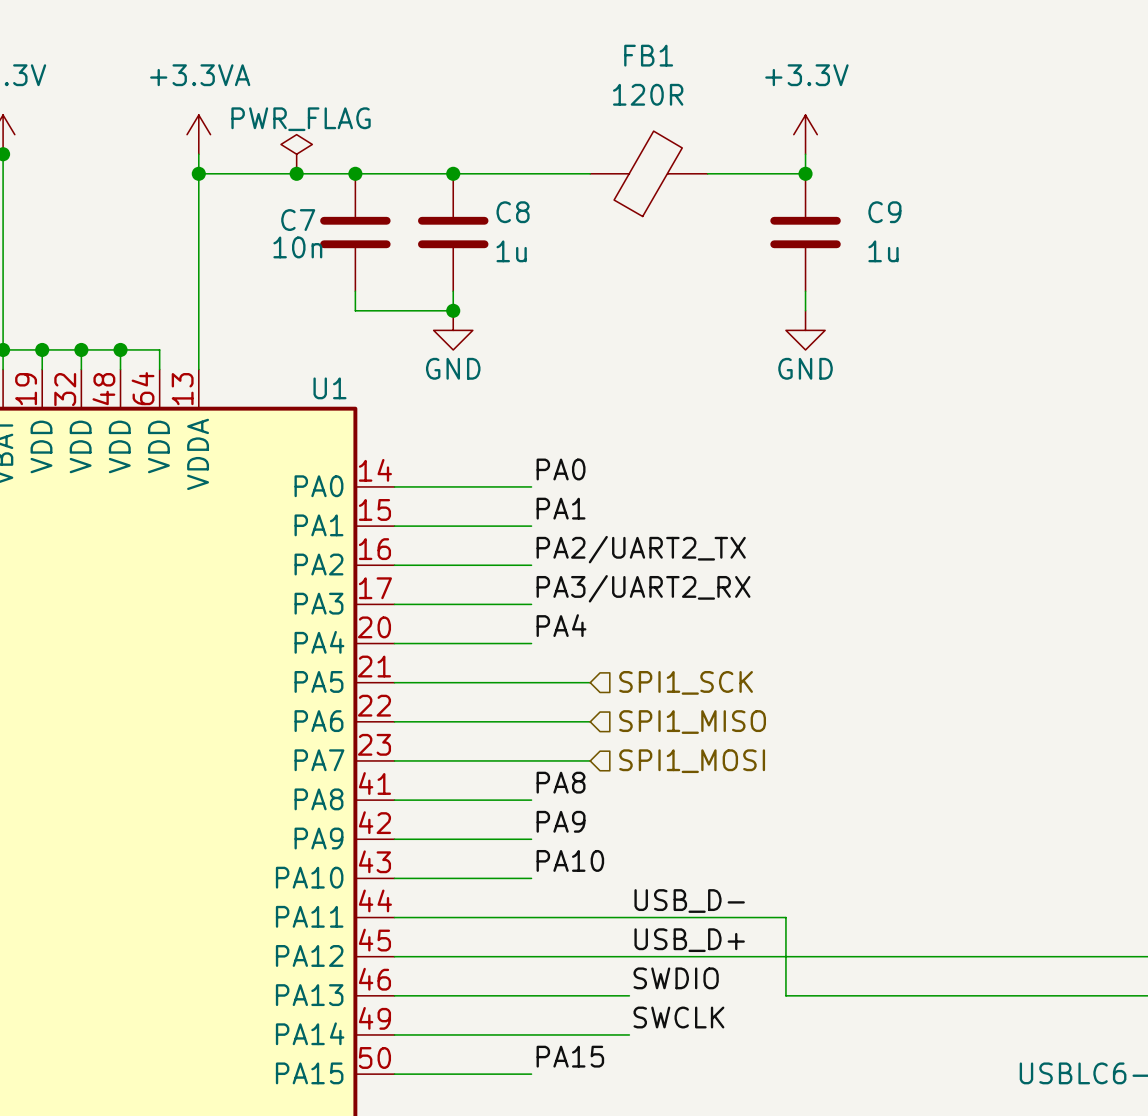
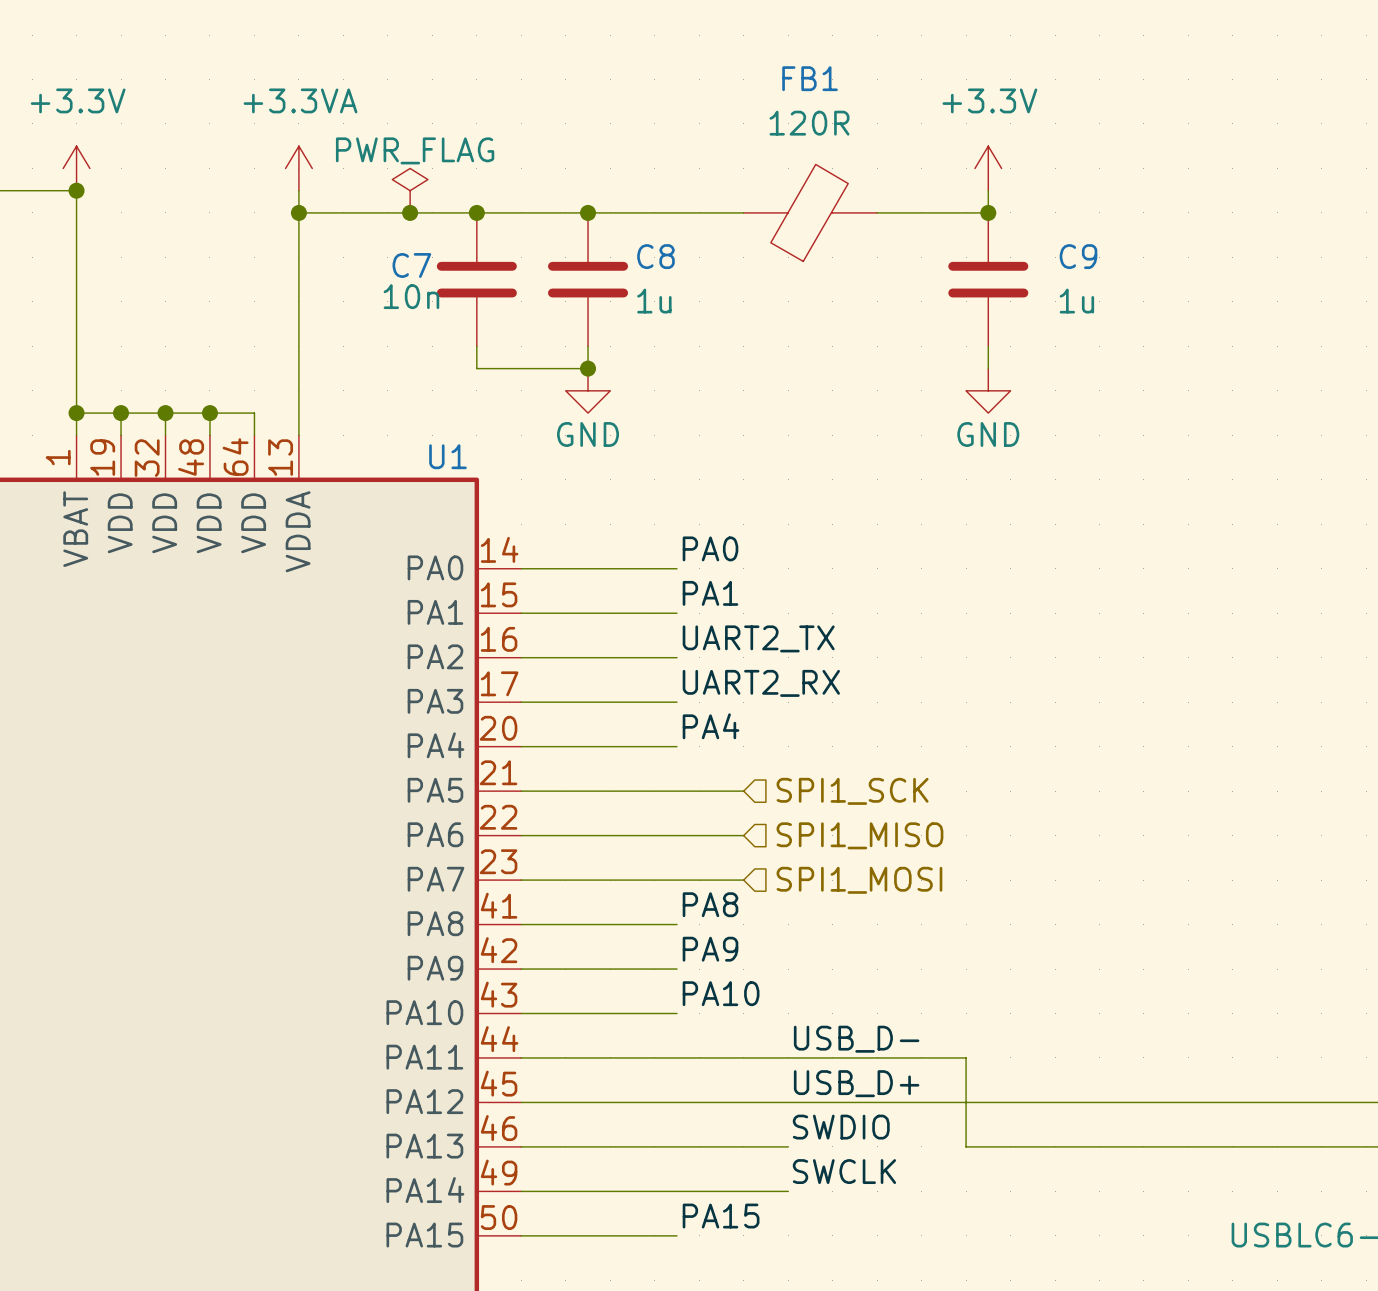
label: PA2/UART2_TX (641, 549) -> UART2_TX (758, 638)
label: PA3/UART2_RX (643, 588) -> UART2_RX (761, 683)

